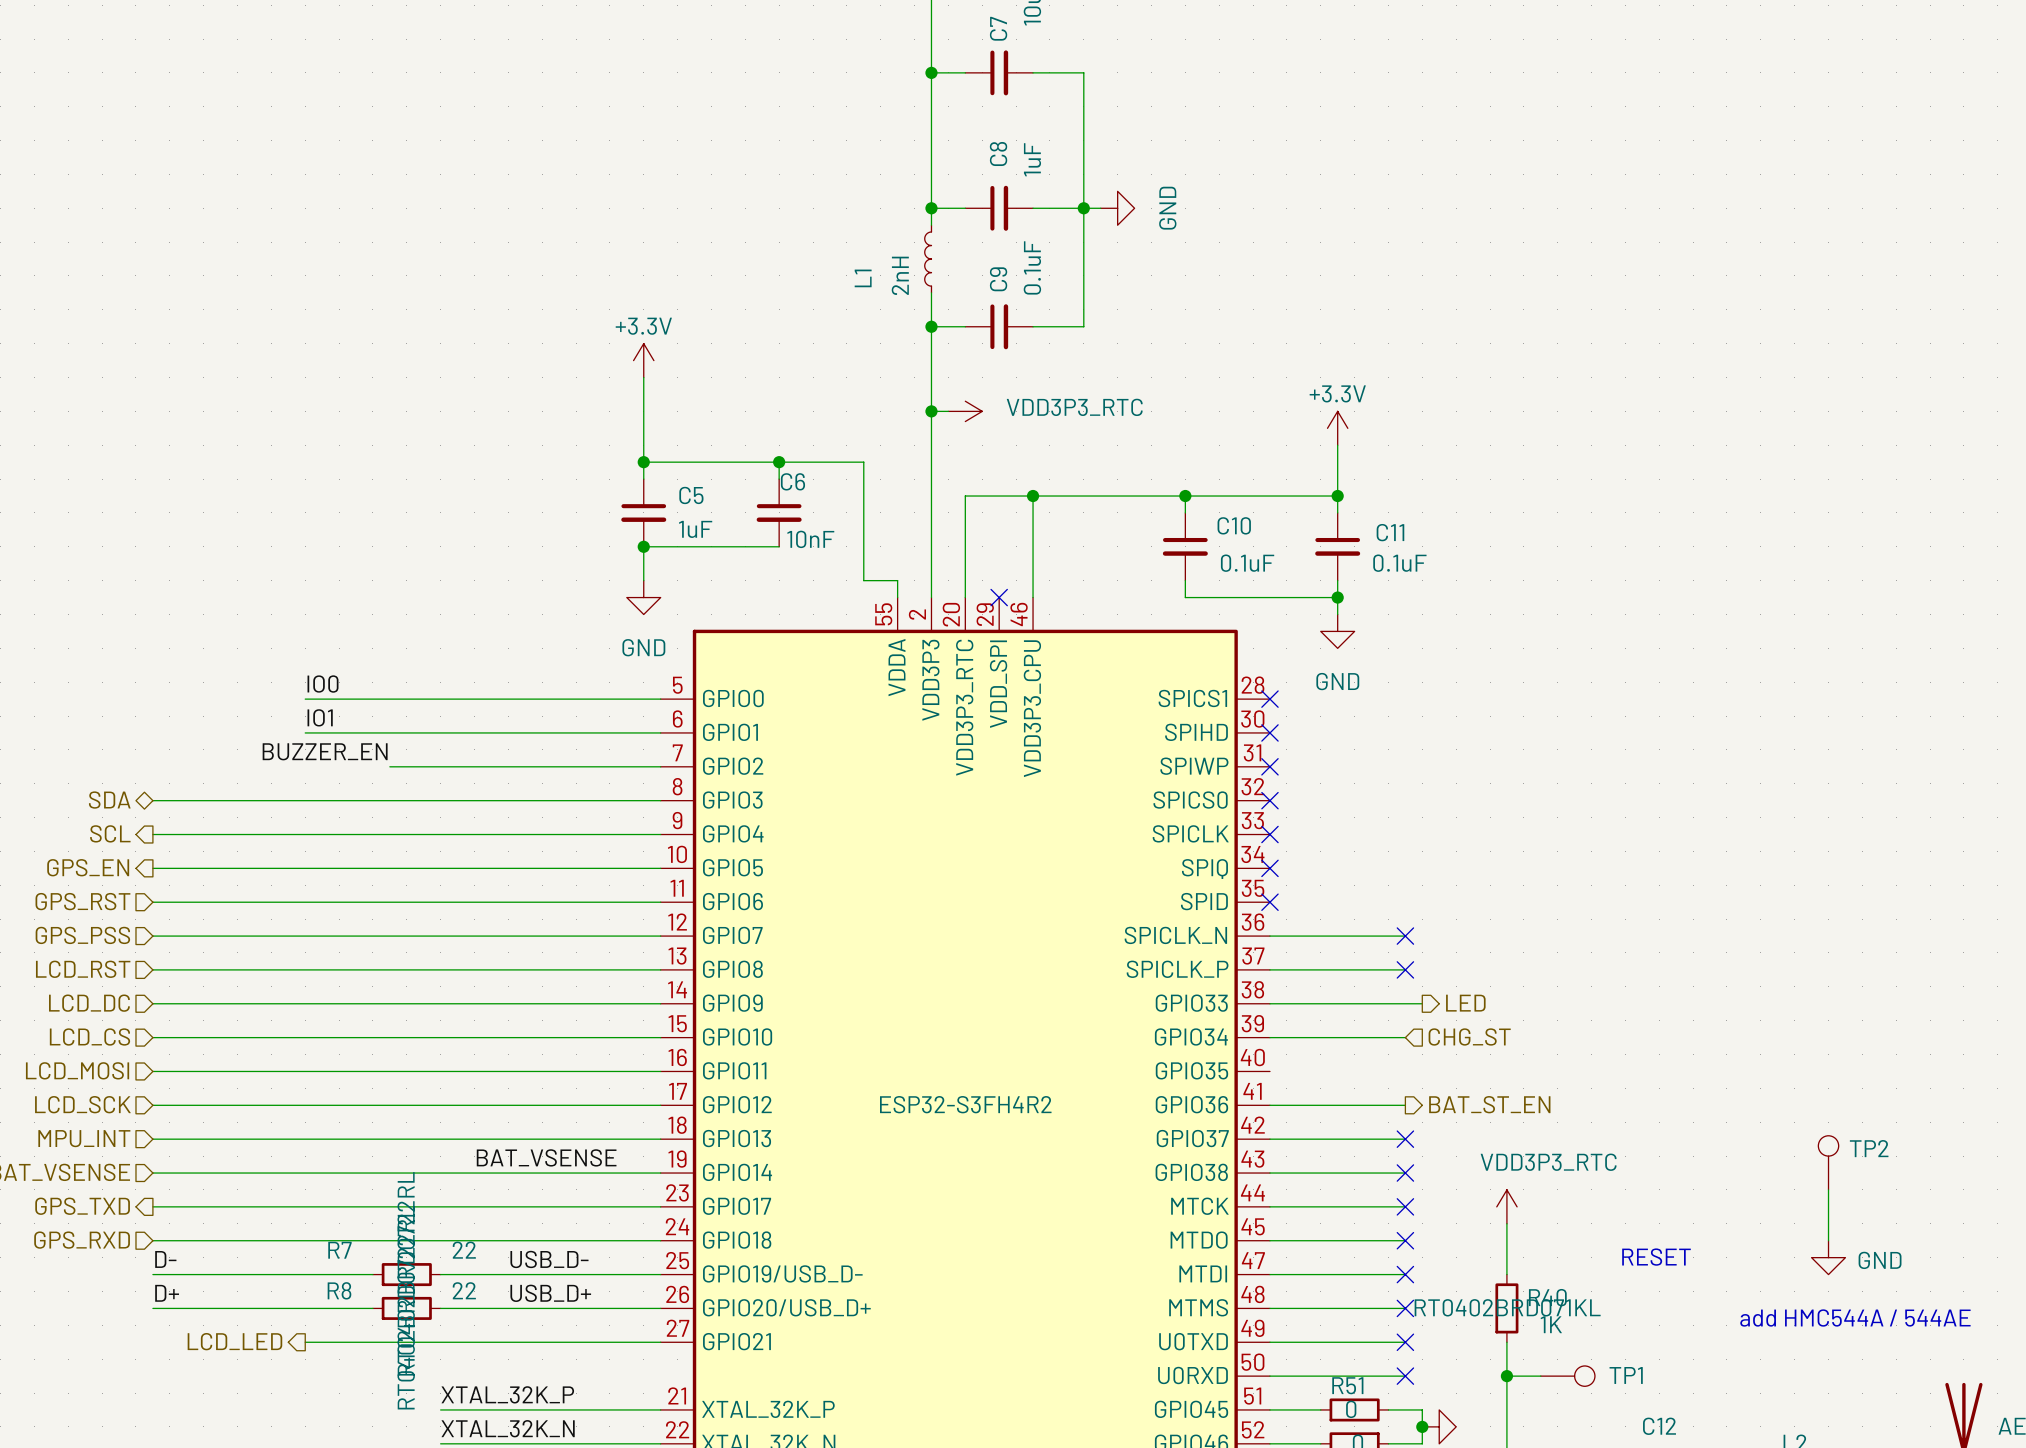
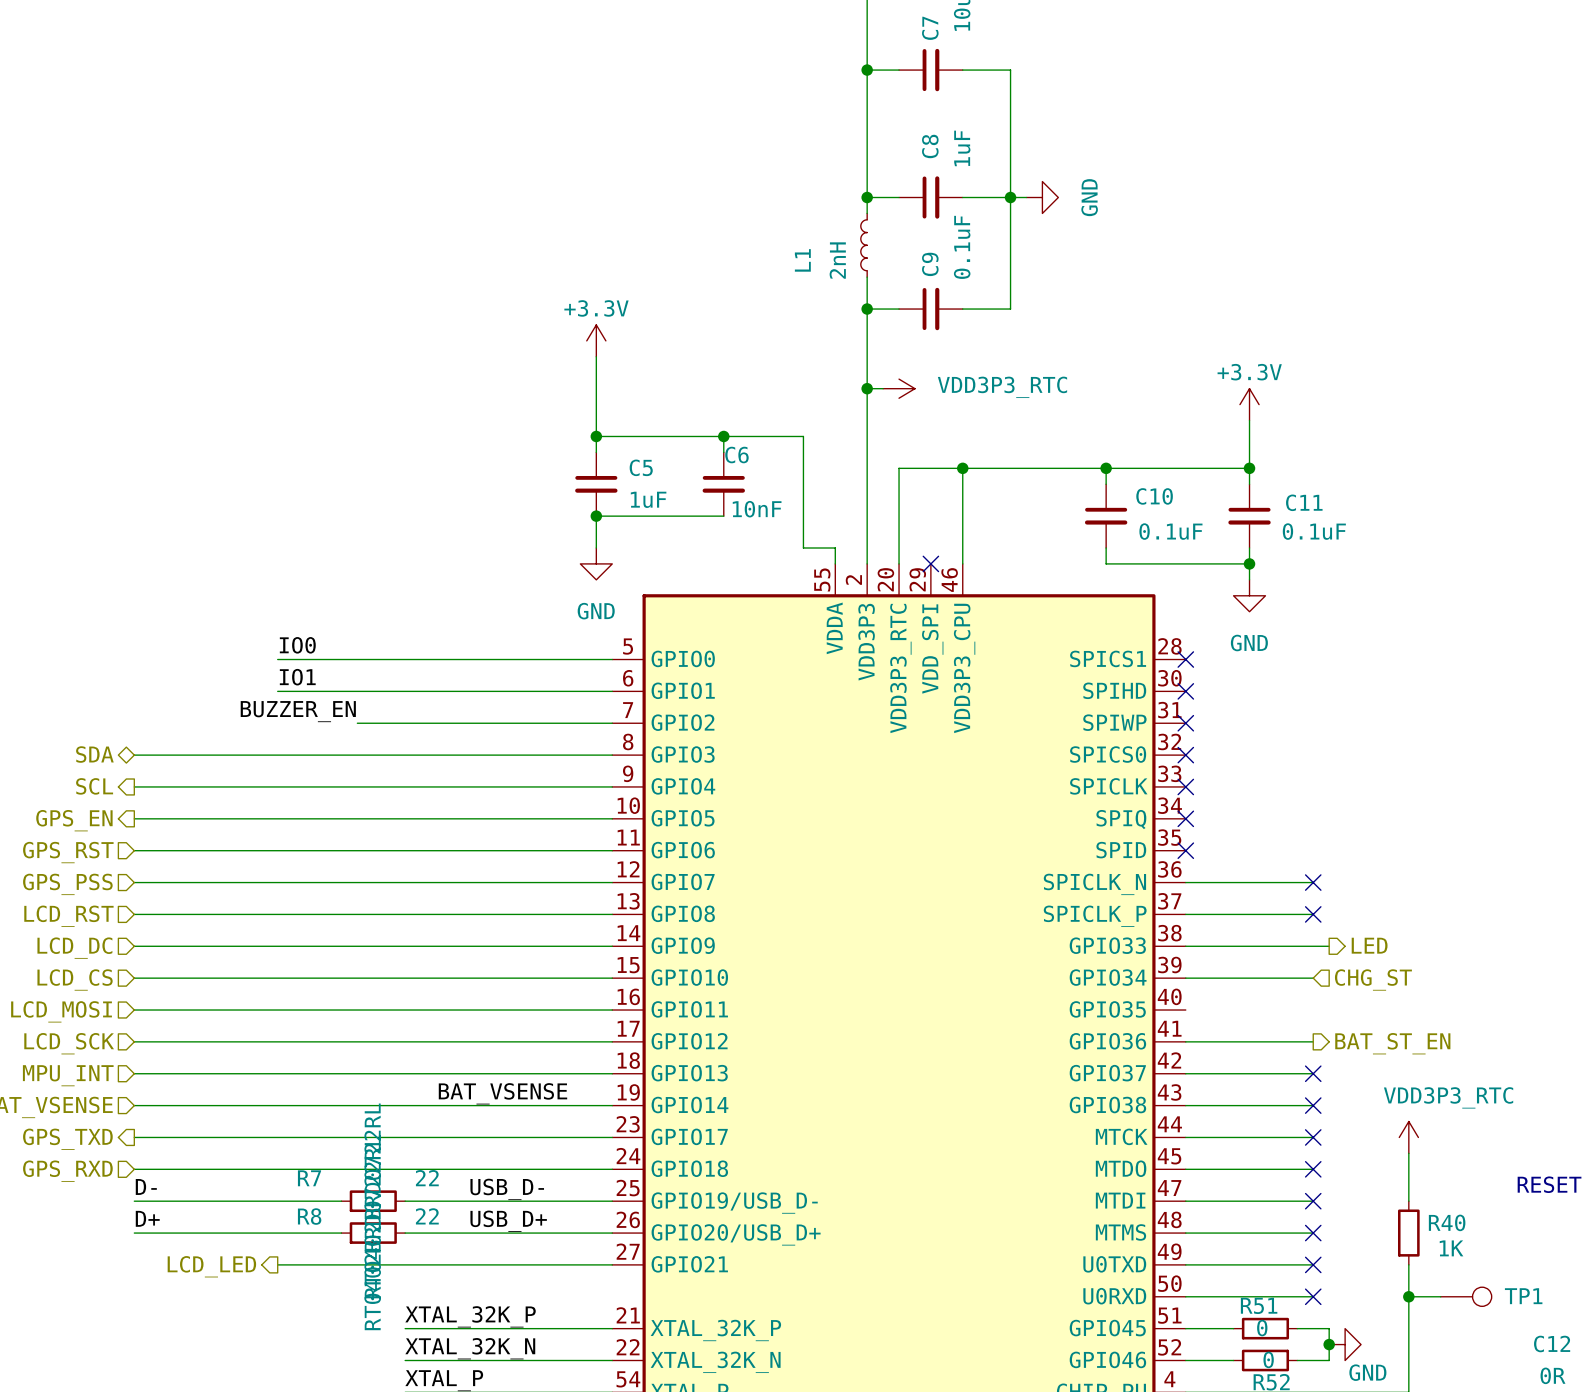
part text: ESP32-S3FH4R2 (965, 1104) -> none
R40 text: RT0402BRD071KL (1507, 1307) -> none

